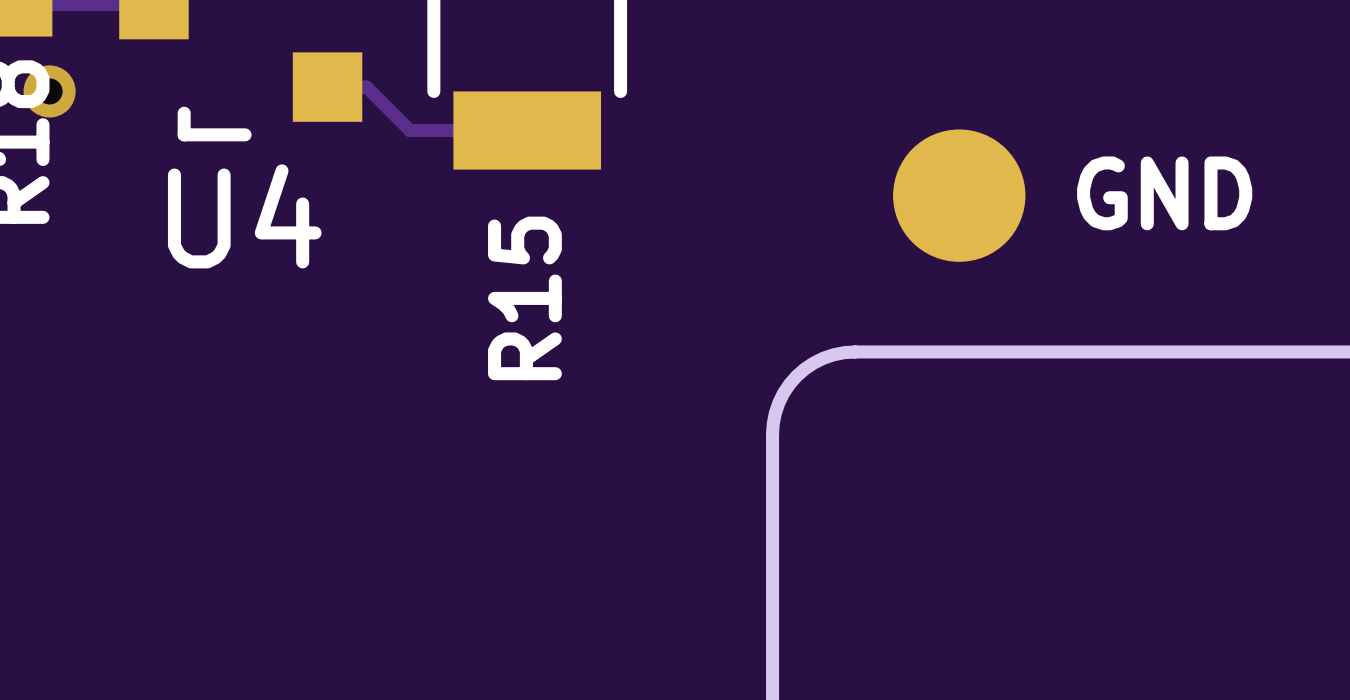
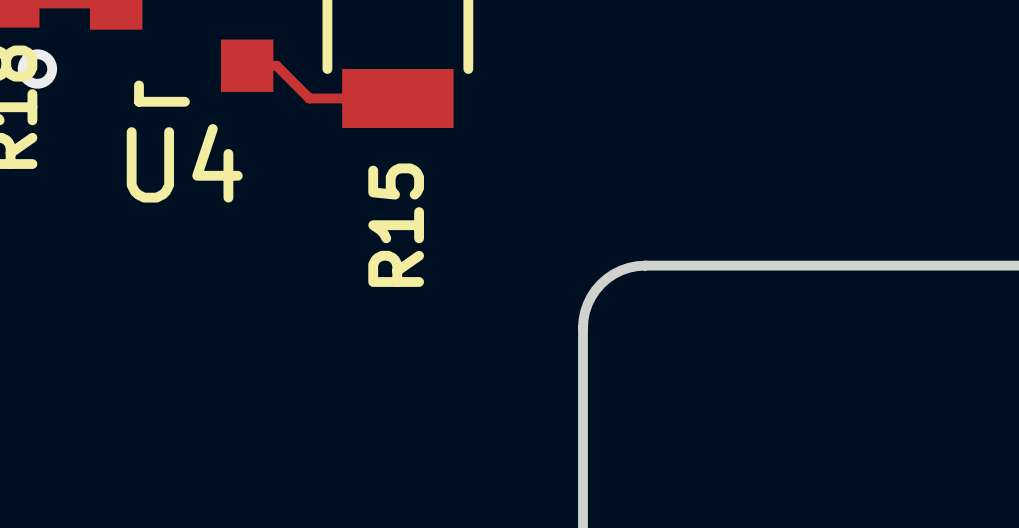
text: GND (1164, 193) -> none
part: (959, 195) -> none

